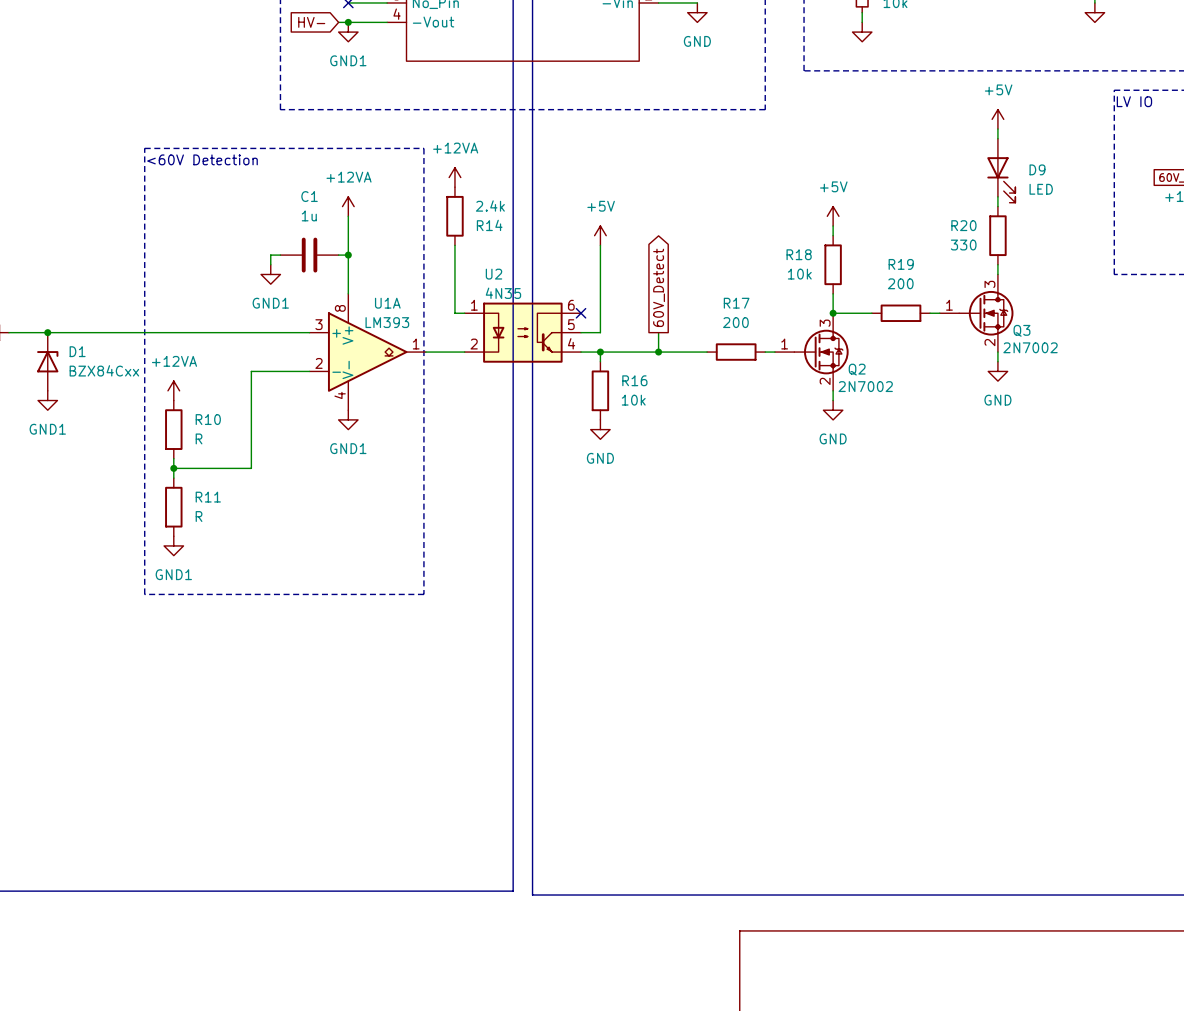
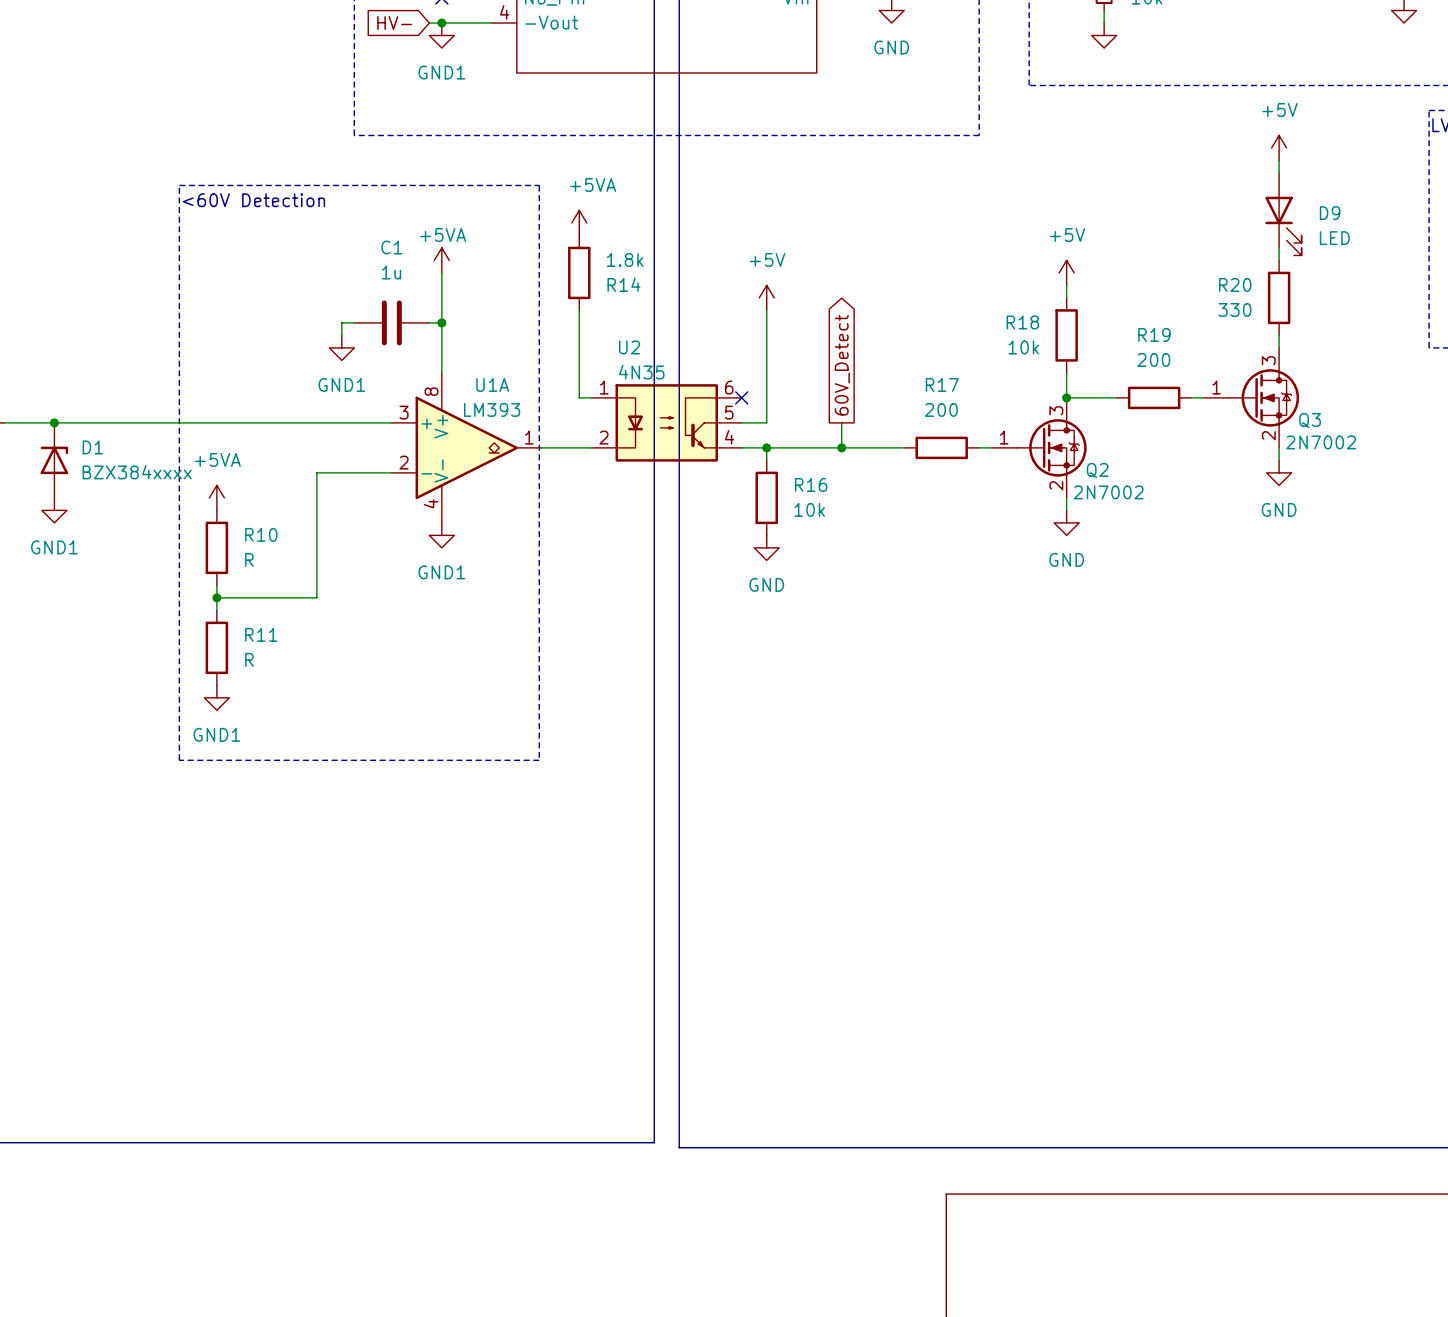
power symbol: +12VA (454, 177) -> +5VA (579, 222)
power symbol: +12VA (348, 206) -> +5VA (441, 260)
R14 value: 2.4k (490, 206) -> 1.8k (625, 259)
D1 value: BZX84Cxx (104, 370) -> BZX384xxxx (137, 472)
power symbol: +12VA (173, 390) -> +5VA (216, 497)

